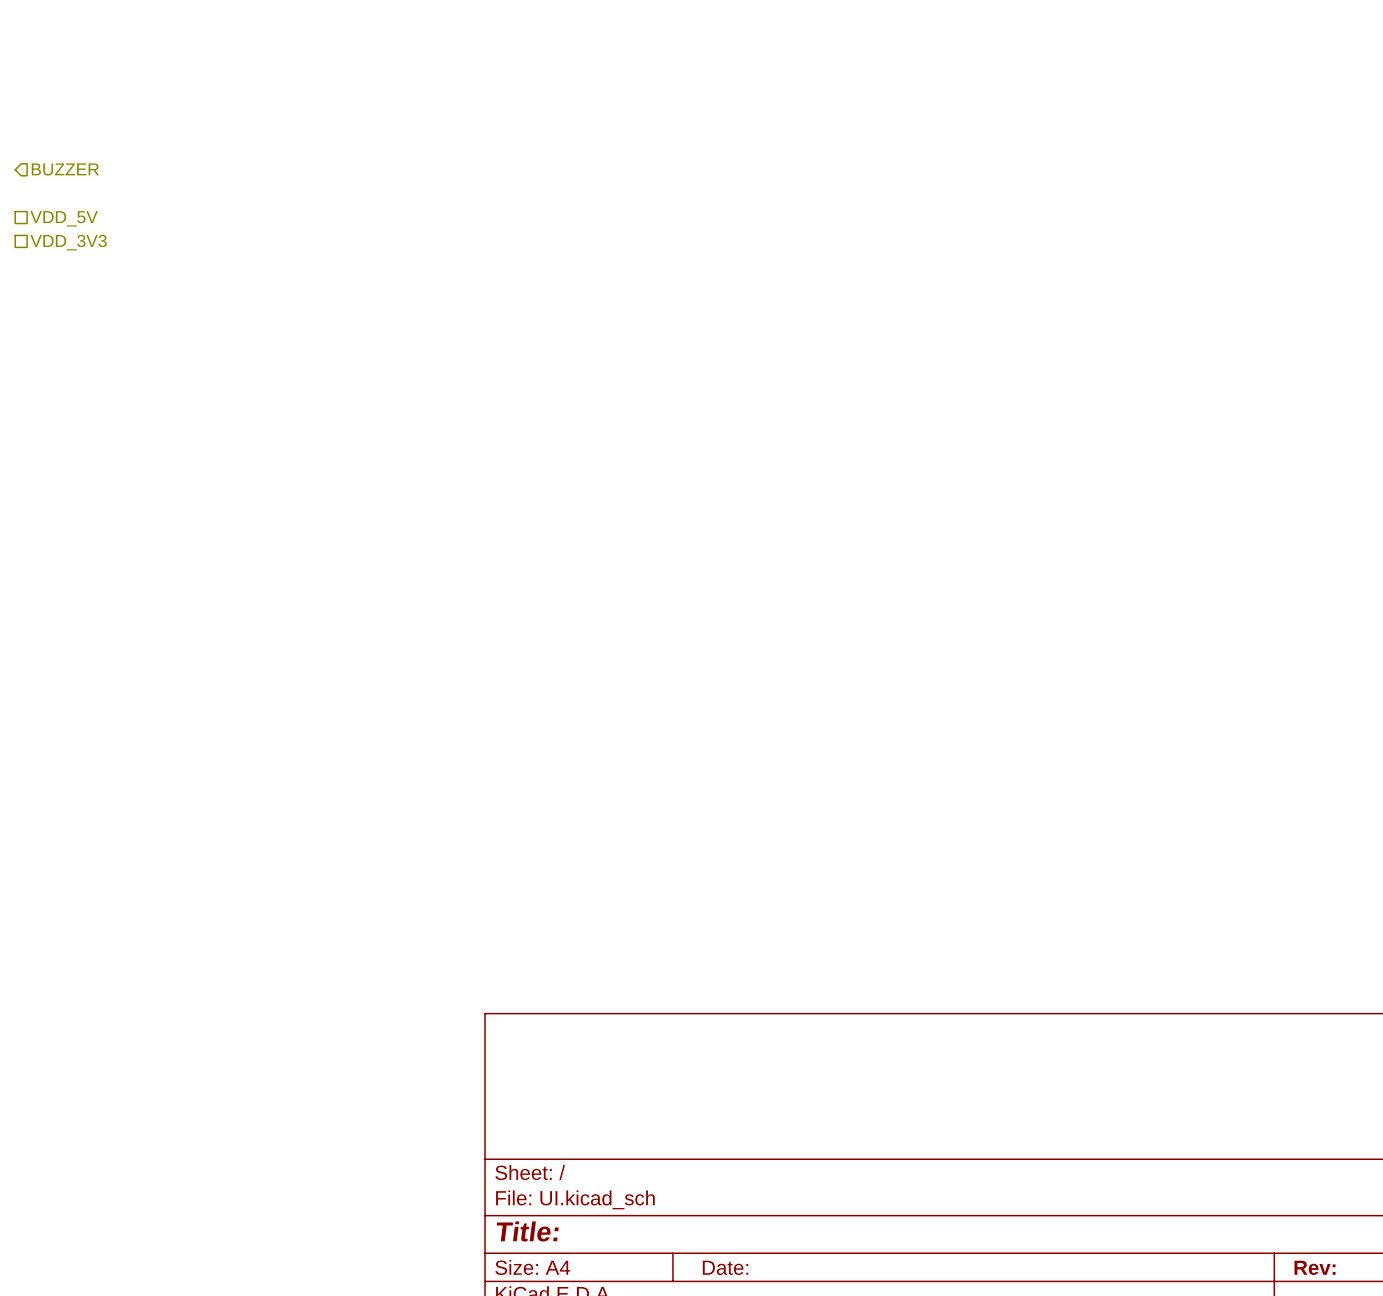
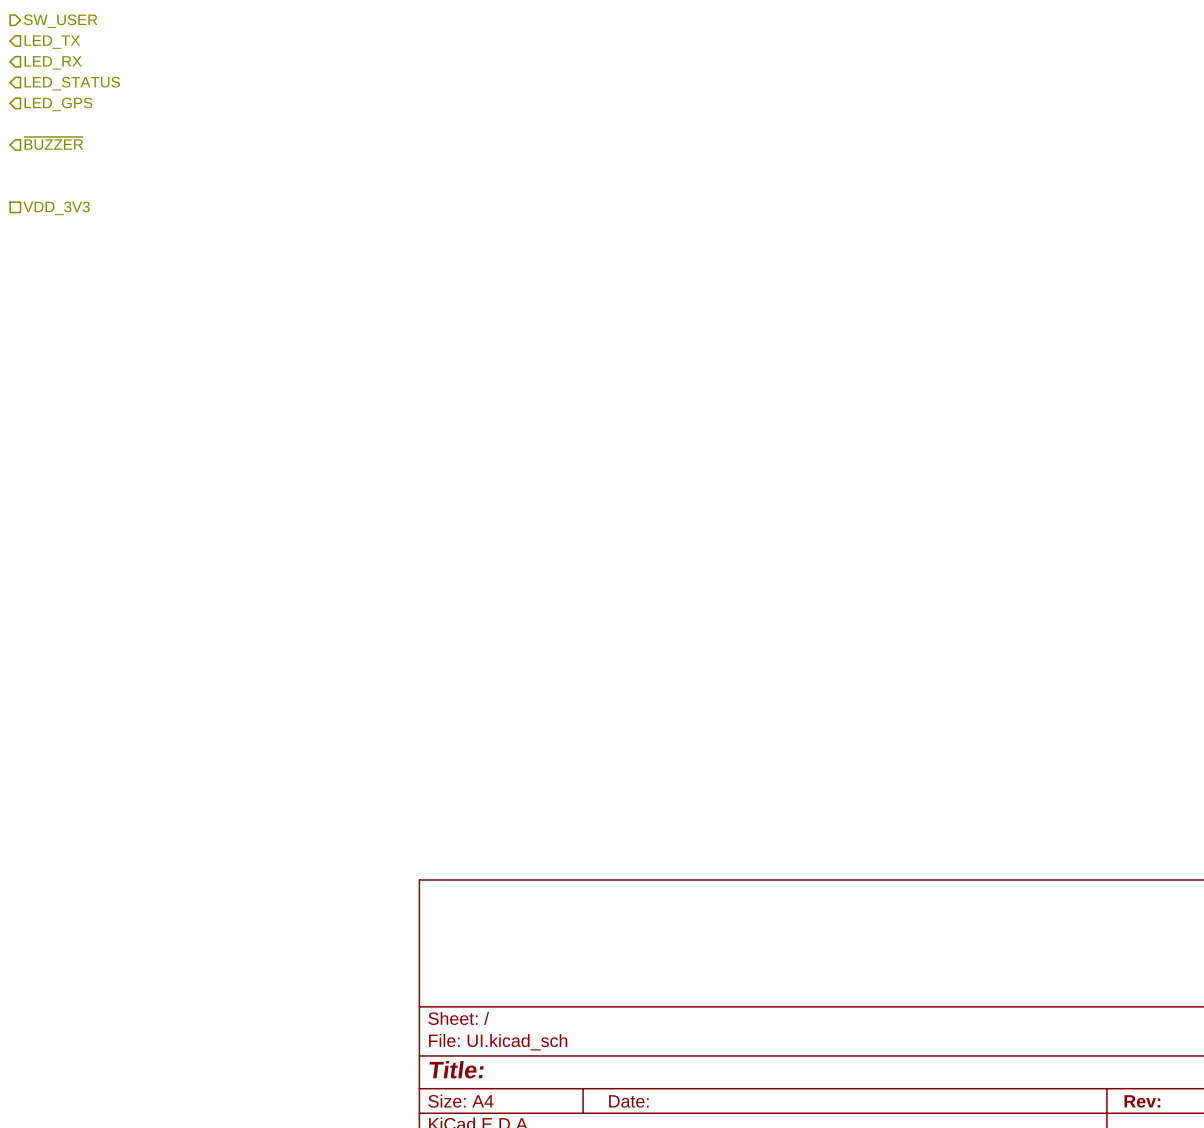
hierarchical label: none -> SW_USER (60, 21)
hierarchical label: none -> LED_TX (52, 42)
hierarchical label: none -> LED_RX (53, 62)
hierarchical label: none -> LED_STATUS (72, 83)
hierarchical label: none -> LED_GPS (58, 104)
hierarchical label: BUZZER (65, 169) -> ~{BUZZER} (53, 143)
hierarchical label: VDD_5V (64, 218) -> none

